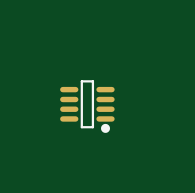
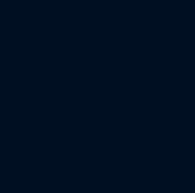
part: (87, 106) -> none

